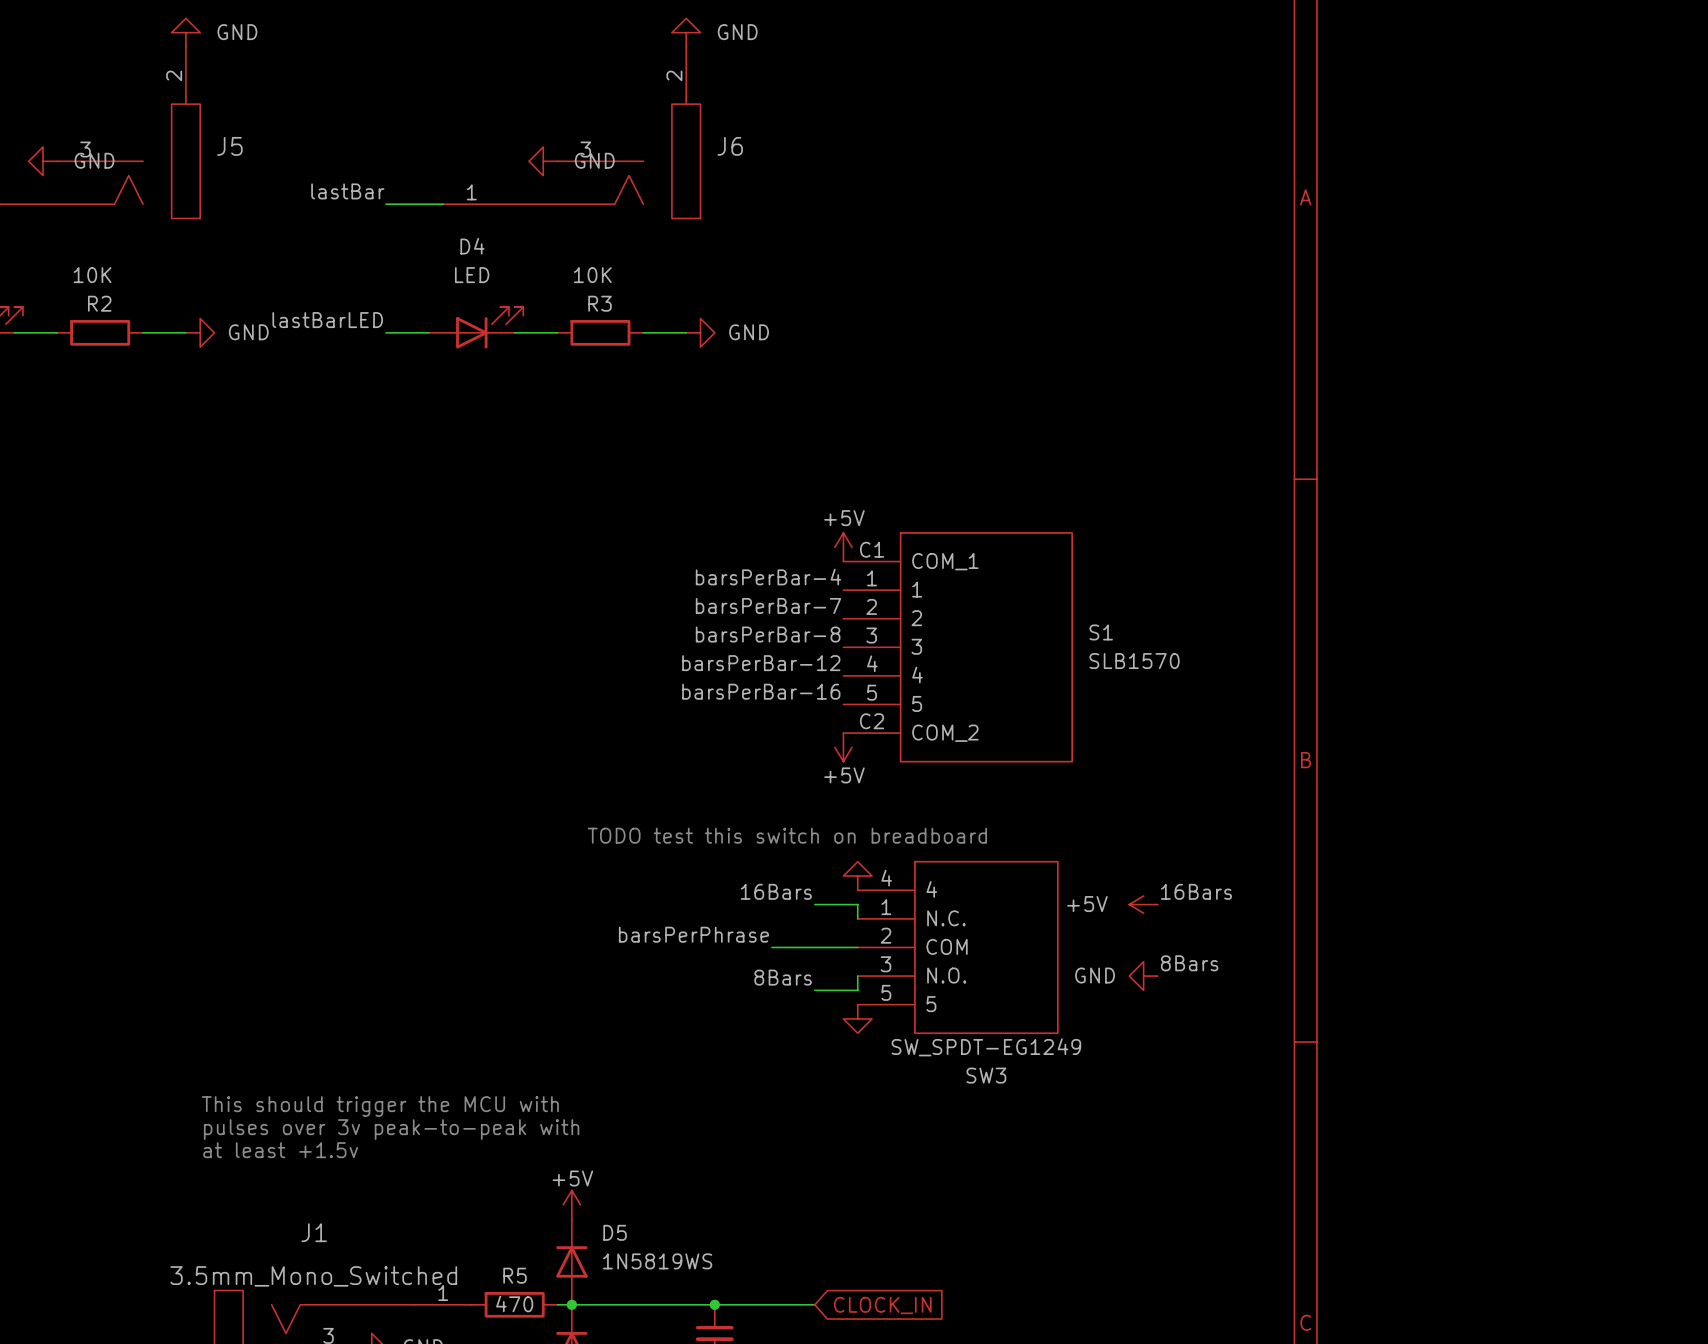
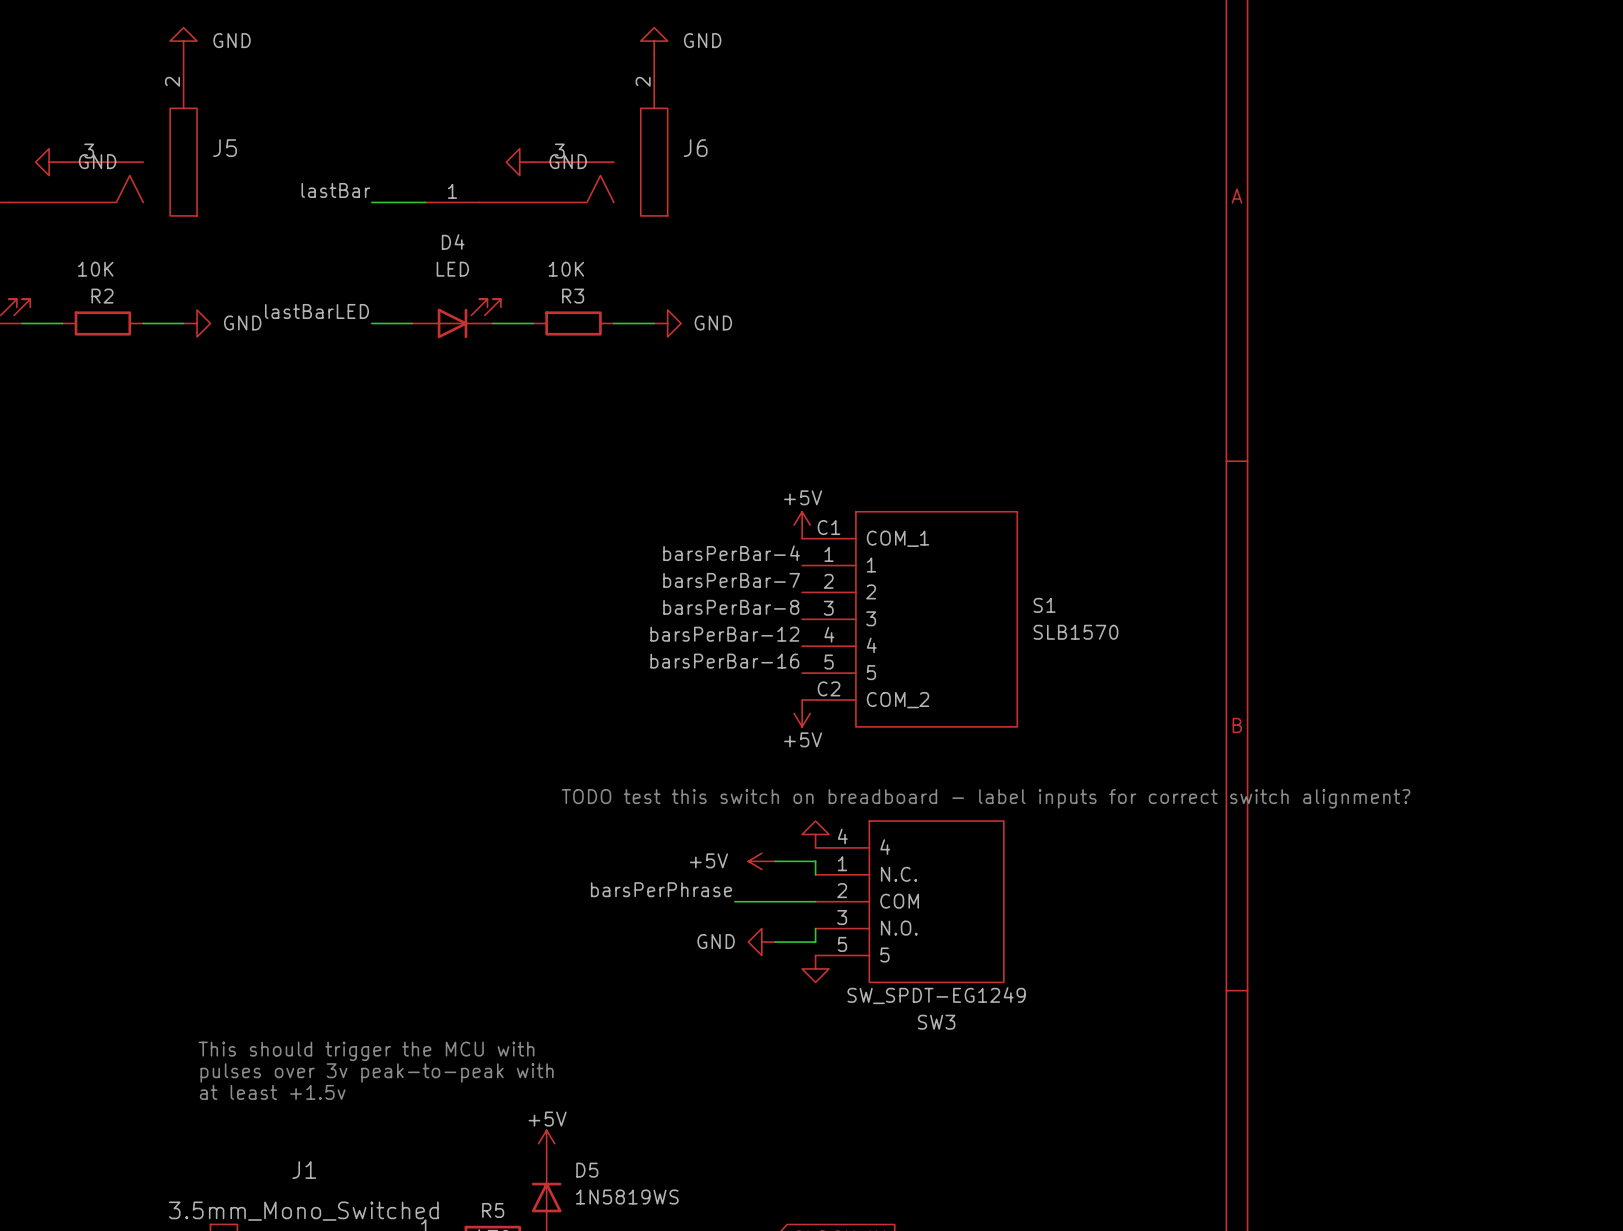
text: TODO test this switch on breadboard (787, 835) -> TODO test this switch on breadboard - label inputs for correct switch alignment? (986, 798)
label: 16Bars (776, 891) -> none
label: 16Bars (1196, 891) -> none
power symbol: none -> +5V (761, 861)
power symbol: +5V (1143, 904) -> none
label: 8Bars (1189, 963) -> none
power symbol: GND (1143, 976) -> none
label: 8Bars (783, 977) -> none
power symbol: none -> GND (761, 942)

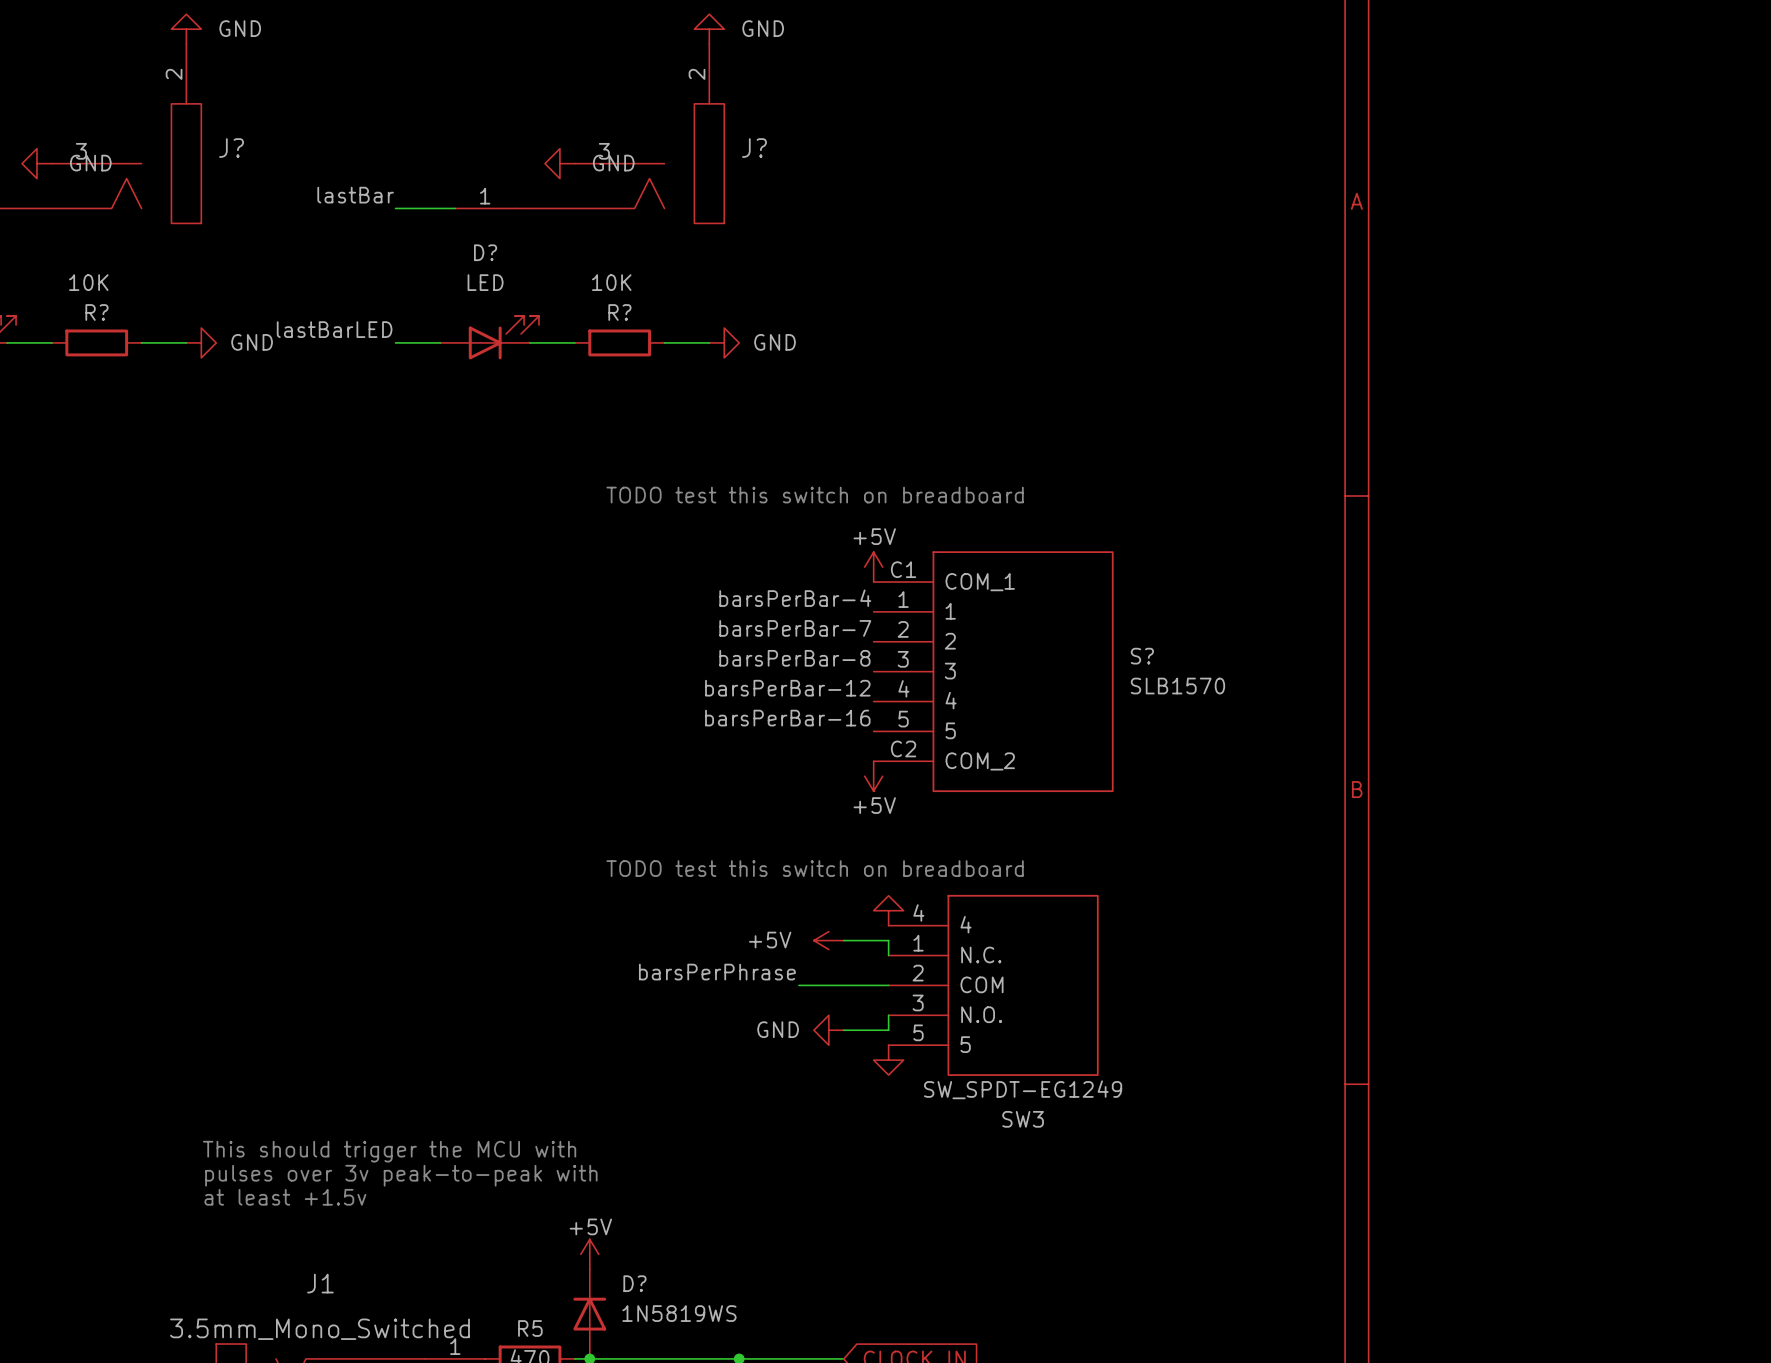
J5 name: J5 (224, 148) -> J? (231, 148)
J6 name: J6 (695, 148) -> J? (754, 148)
D4 name: D4 (453, 241) -> D? (485, 252)
R2 name: R2 (102, 296) -> R? (96, 312)
R3 name: R3 (573, 296) -> R? (619, 312)
text: none -> TODO test this switch on breadboard (815, 495)
S1 name: S1 (1044, 605) -> S? (1142, 656)
text: TODO test this switch on breadboard - label inputs for correct switch alignment? (986, 798) -> TODO test this switch on breadboard (815, 868)
D5 name: D5 (587, 1170) -> D? (634, 1283)

